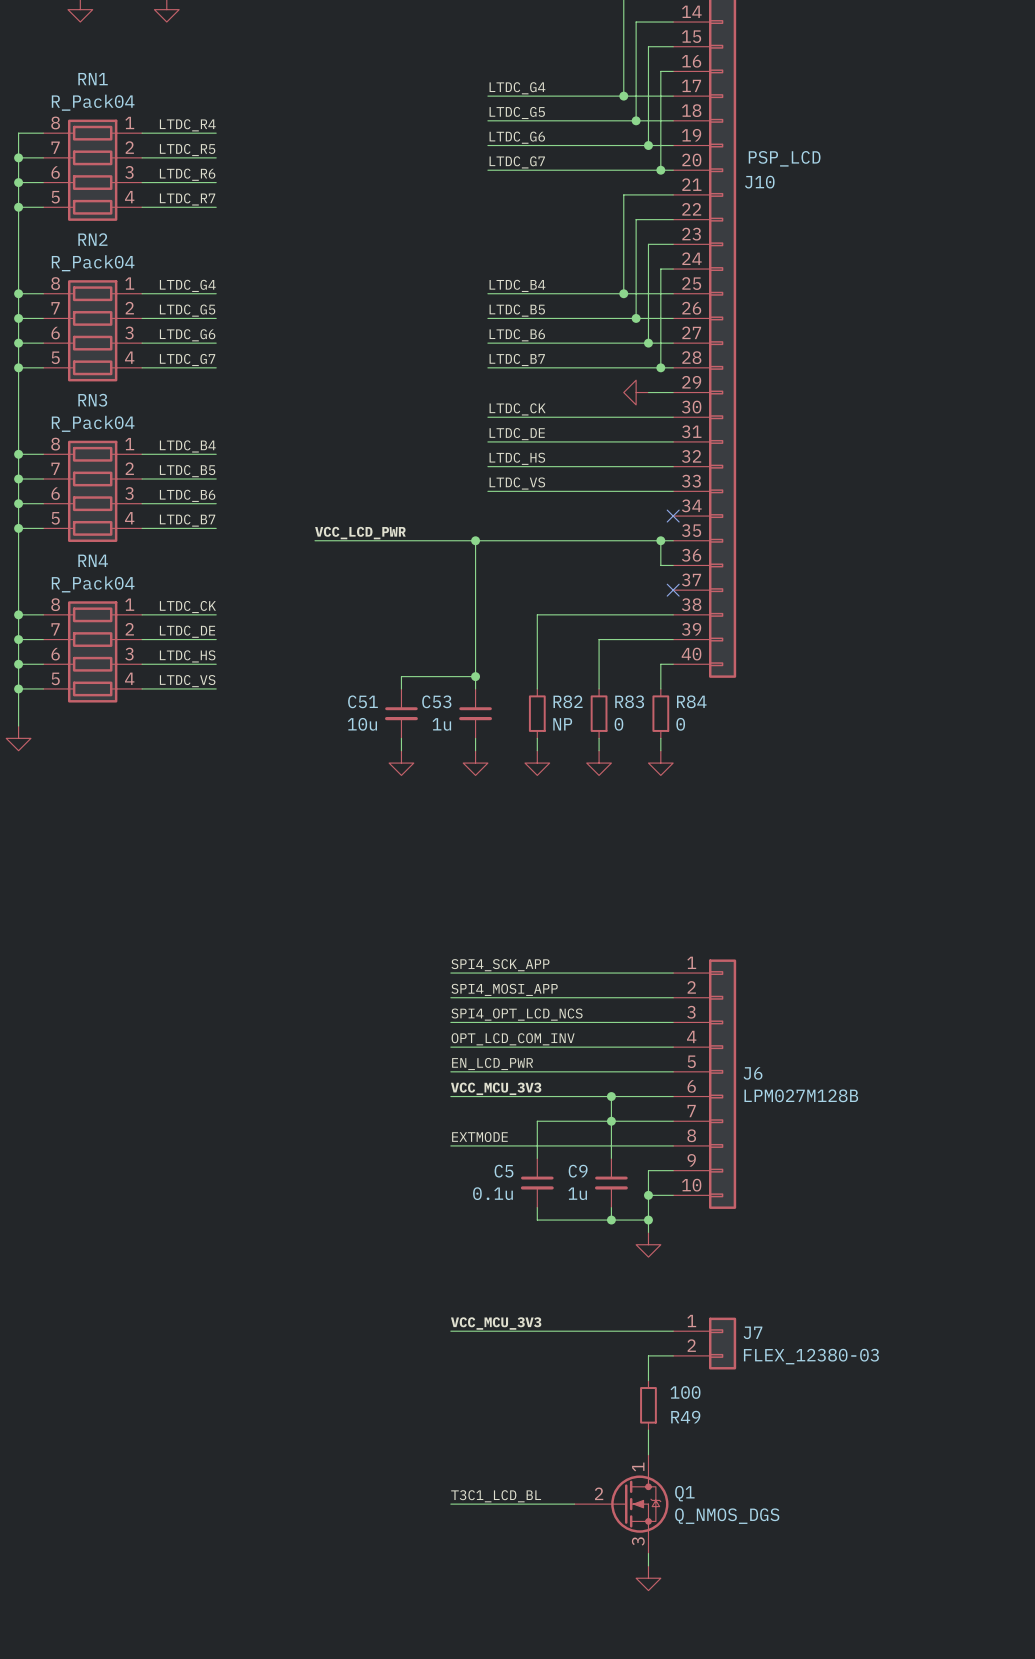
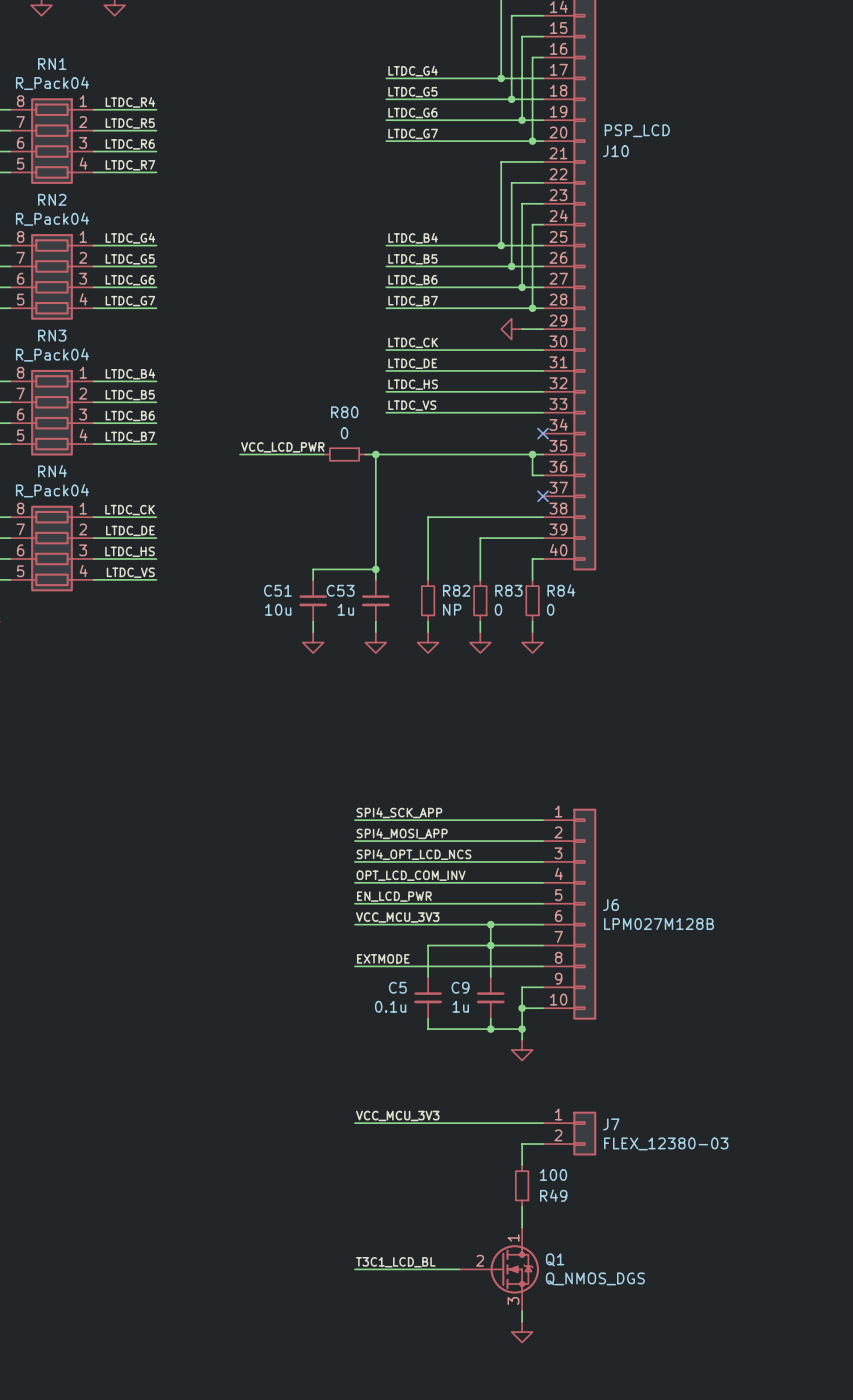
wire: (413, 540) (463, 540) -> none
R80: none -> 0 (344, 454)

